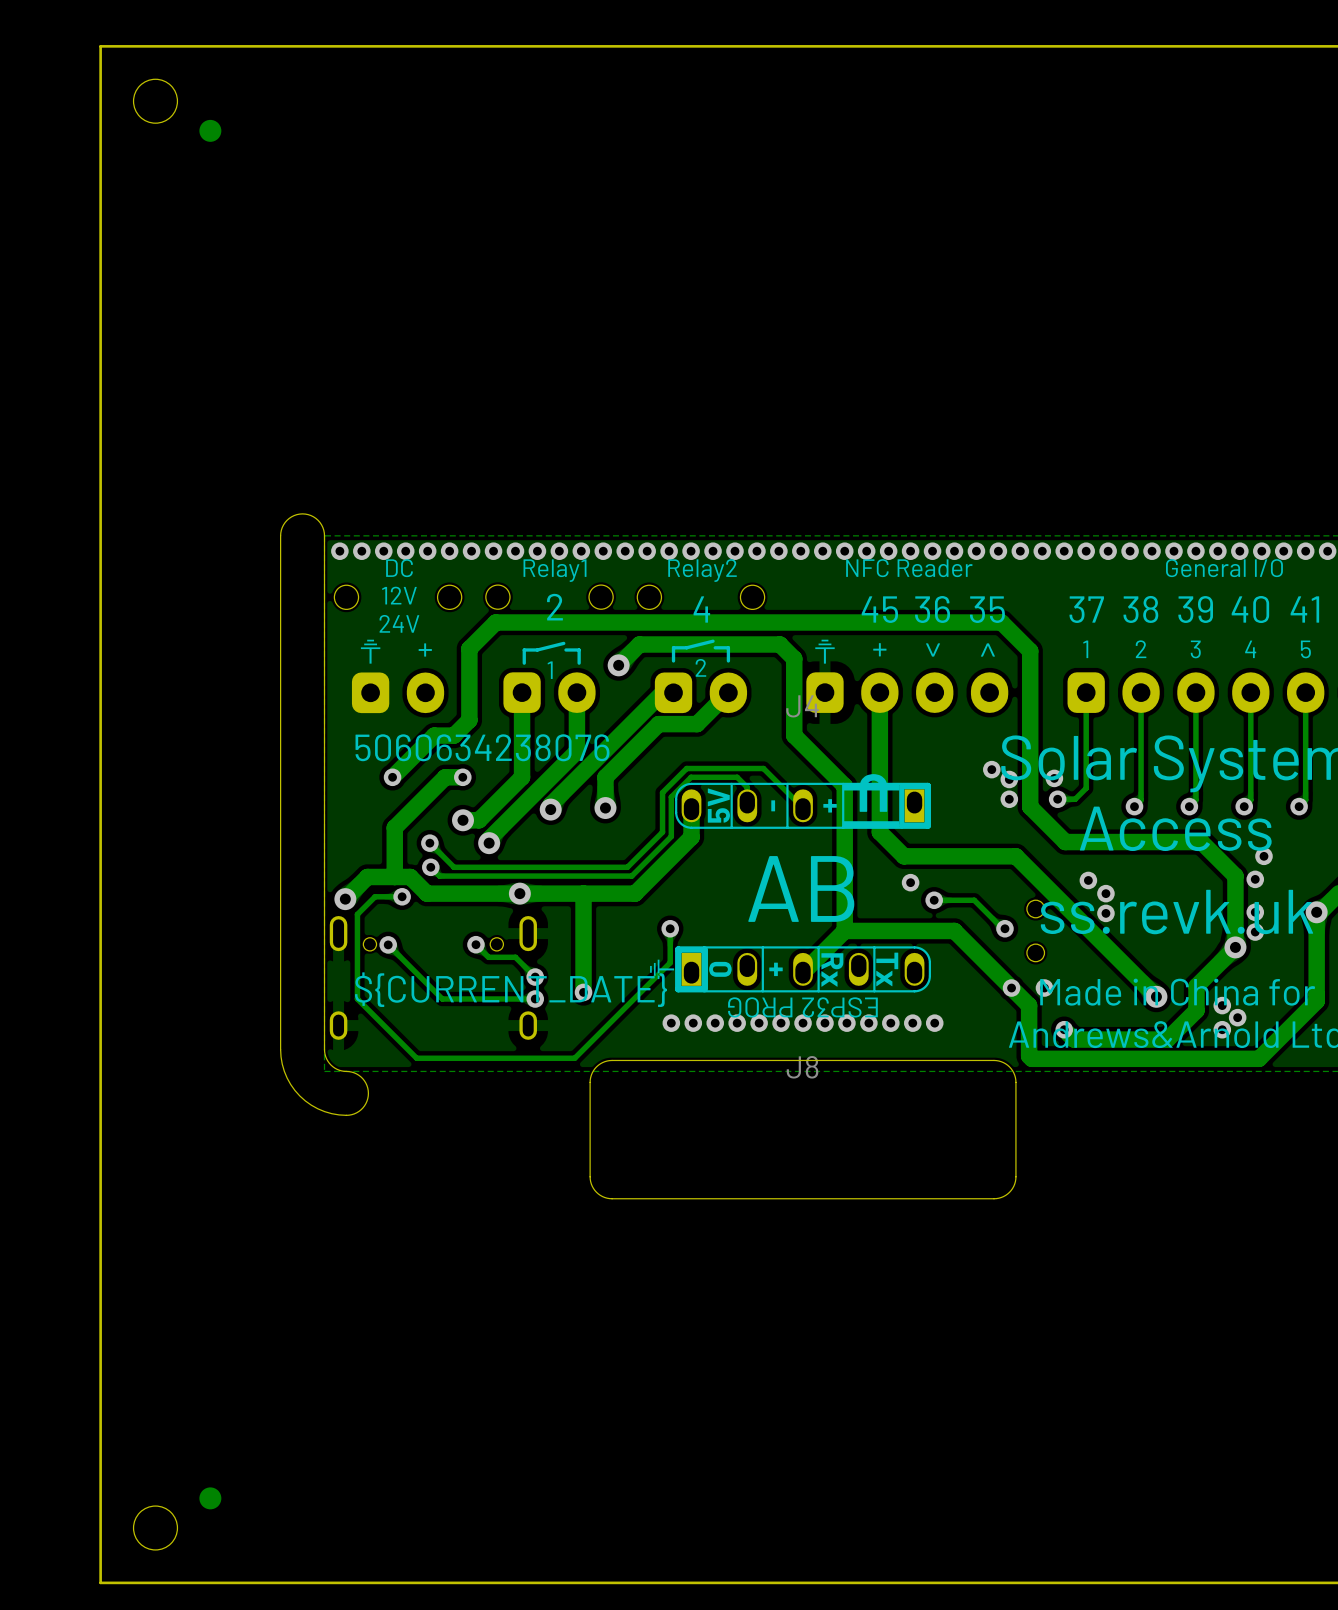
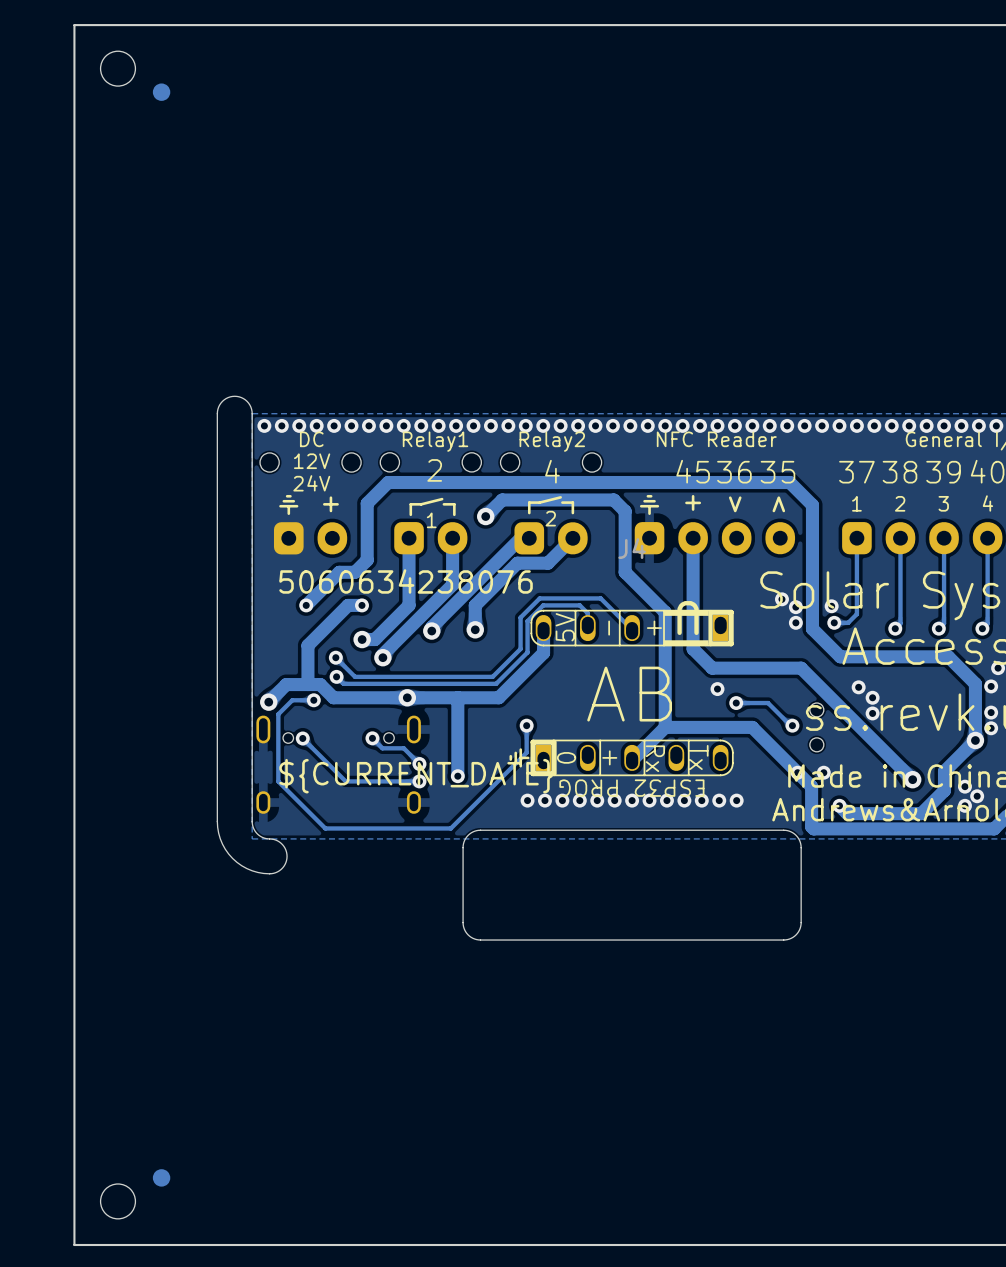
J8 name: J8 (802, 1067) -> none

